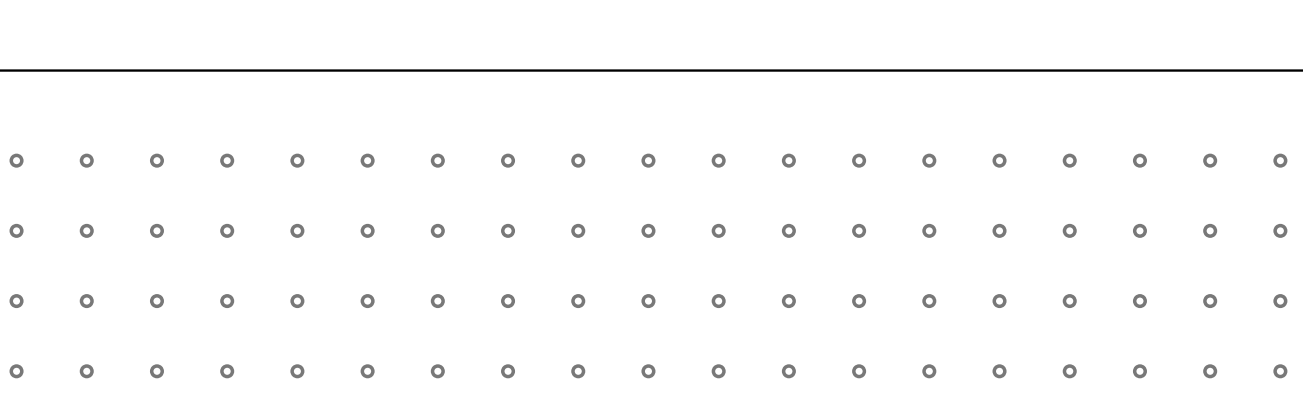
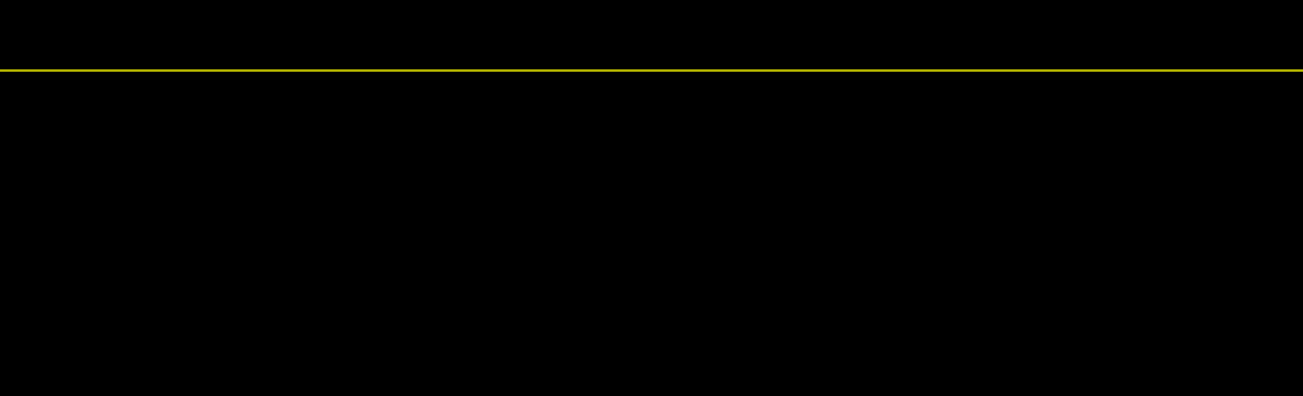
via: (16, 160) -> none
via: (86, 160) -> none
via: (156, 160) -> none
via: (227, 160) -> none
via: (297, 160) -> none
via: (367, 160) -> none
via: (437, 160) -> none
via: (508, 160) -> none
via: (578, 160) -> none
via: (648, 160) -> none
via: (718, 160) -> none
via: (788, 160) -> none
via: (859, 160) -> none
via: (929, 160) -> none
via: (999, 160) -> none
via: (1069, 160) -> none
via: (1139, 160) -> none
via: (1210, 160) -> none
via: (1280, 160) -> none
via: (16, 230) -> none
via: (86, 230) -> none
via: (156, 230) -> none
via: (227, 230) -> none
via: (297, 230) -> none
via: (367, 230) -> none
via: (437, 230) -> none
via: (508, 230) -> none
via: (578, 230) -> none
via: (648, 230) -> none
via: (718, 230) -> none
via: (788, 230) -> none
via: (859, 230) -> none
via: (929, 230) -> none
via: (999, 230) -> none
via: (1069, 230) -> none
via: (1139, 230) -> none
via: (1210, 230) -> none
via: (1280, 230) -> none
via: (16, 301) -> none
via: (86, 301) -> none
via: (156, 301) -> none
via: (227, 301) -> none
via: (297, 301) -> none
via: (367, 301) -> none
via: (437, 301) -> none
via: (508, 301) -> none
via: (578, 301) -> none
via: (648, 301) -> none
via: (718, 301) -> none
via: (788, 301) -> none
via: (859, 301) -> none
via: (929, 301) -> none
via: (999, 301) -> none
via: (1069, 301) -> none
via: (1139, 301) -> none
via: (1210, 301) -> none
via: (1280, 301) -> none
via: (16, 371) -> none
via: (86, 371) -> none
via: (156, 371) -> none
via: (227, 371) -> none
via: (297, 371) -> none
via: (367, 371) -> none
via: (437, 371) -> none
via: (508, 371) -> none
via: (578, 371) -> none
via: (648, 371) -> none
via: (718, 371) -> none
via: (788, 371) -> none
via: (859, 371) -> none
via: (929, 371) -> none
via: (999, 371) -> none
via: (1069, 371) -> none
via: (1139, 371) -> none
via: (1210, 371) -> none
via: (1280, 371) -> none

